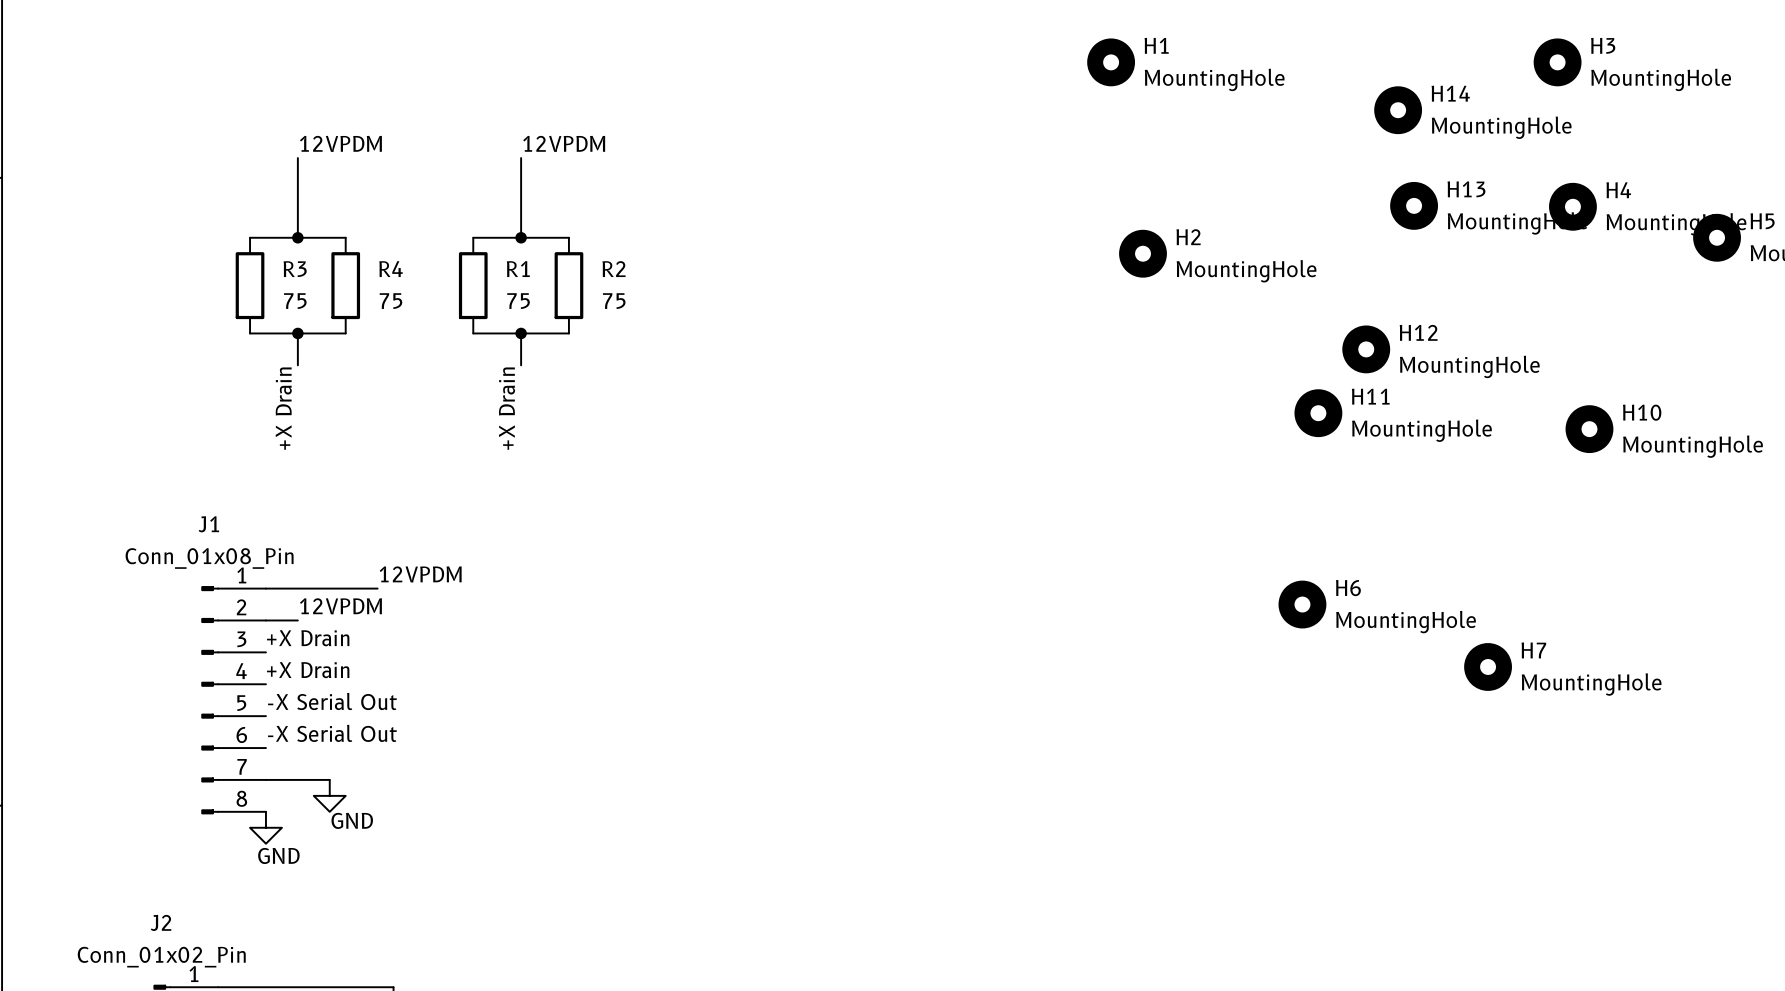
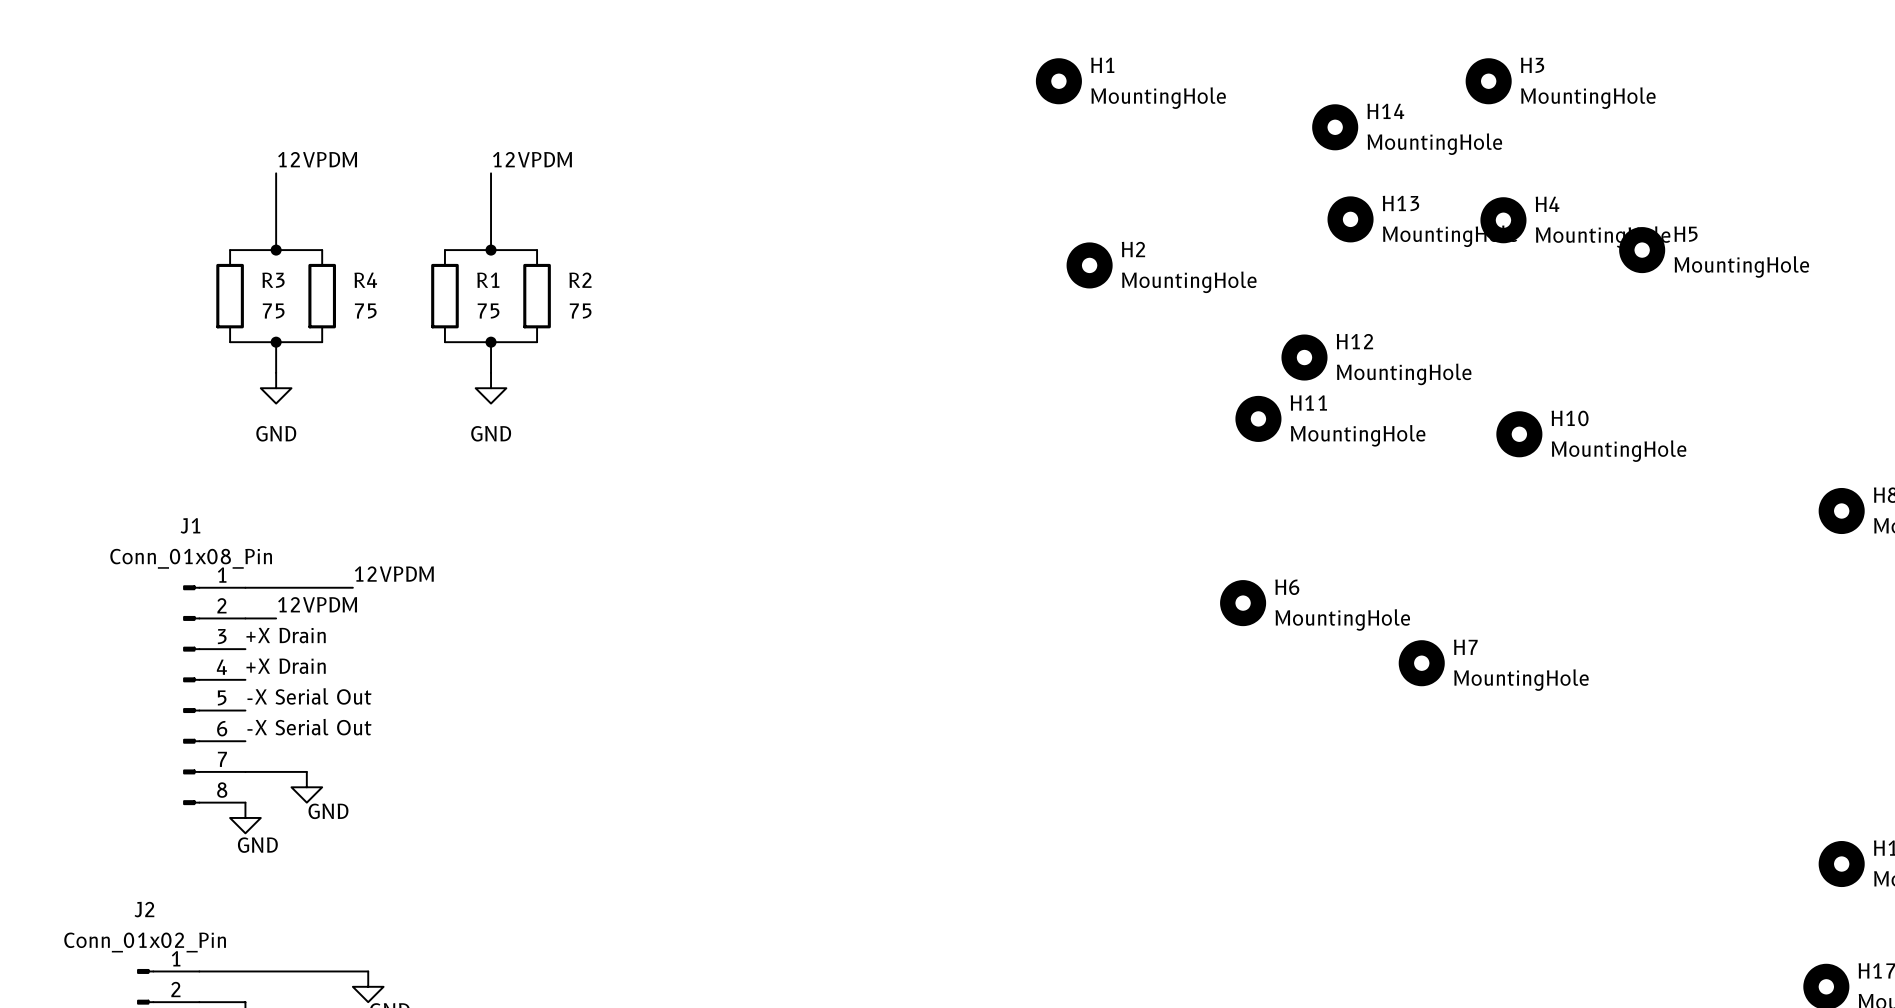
power symbol: none -> GND (276, 388)
power symbol: none -> GND (491, 388)
label: +X Drain (283, 408) -> none
label: +X Drain (506, 408) -> none

